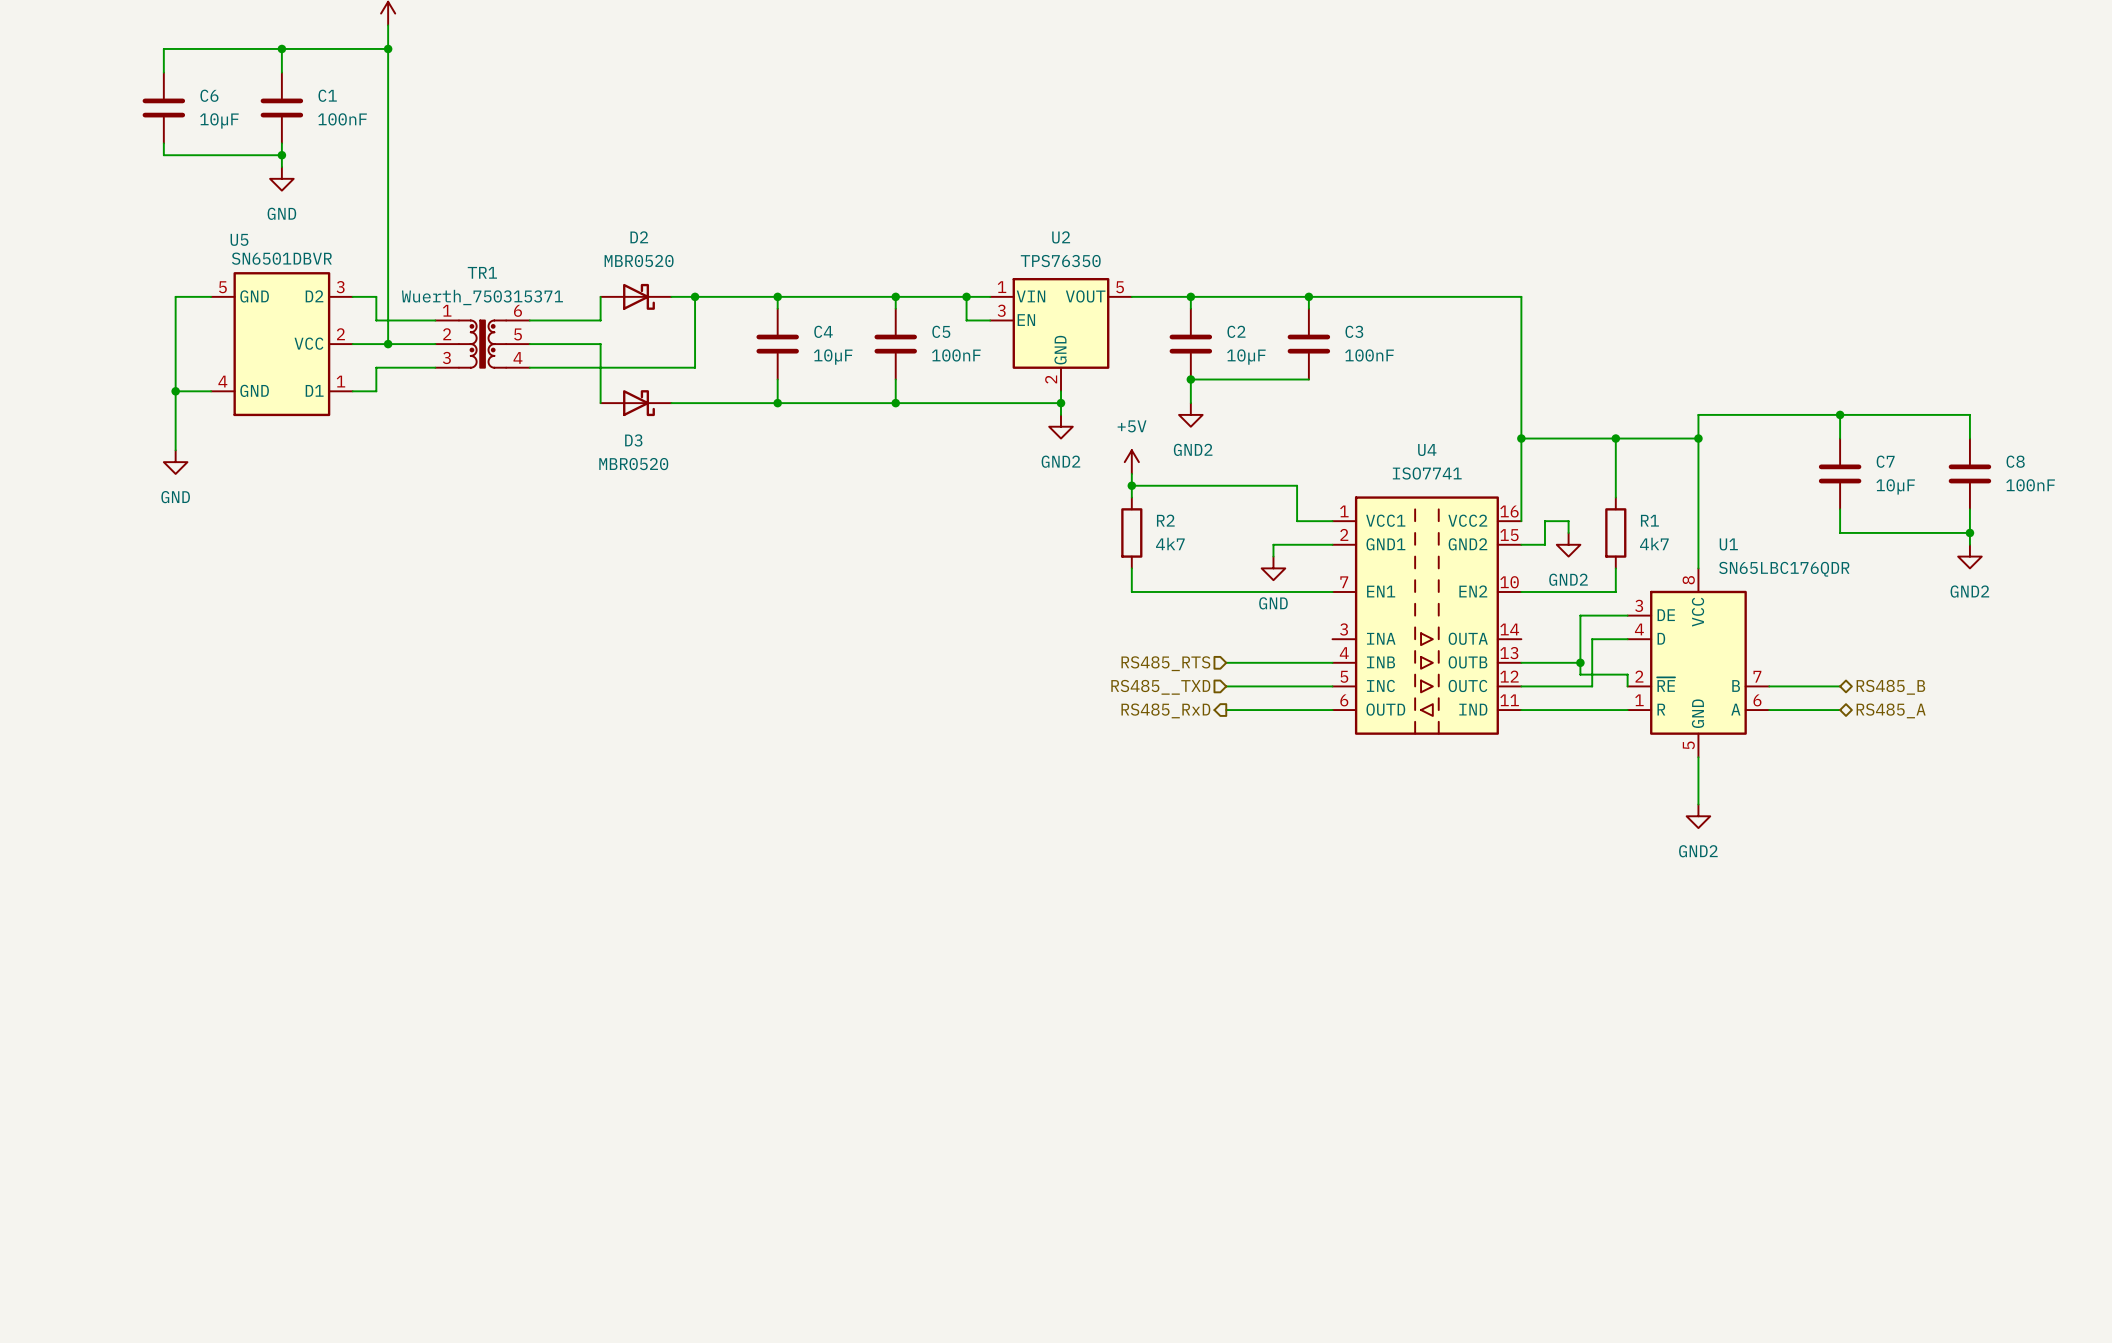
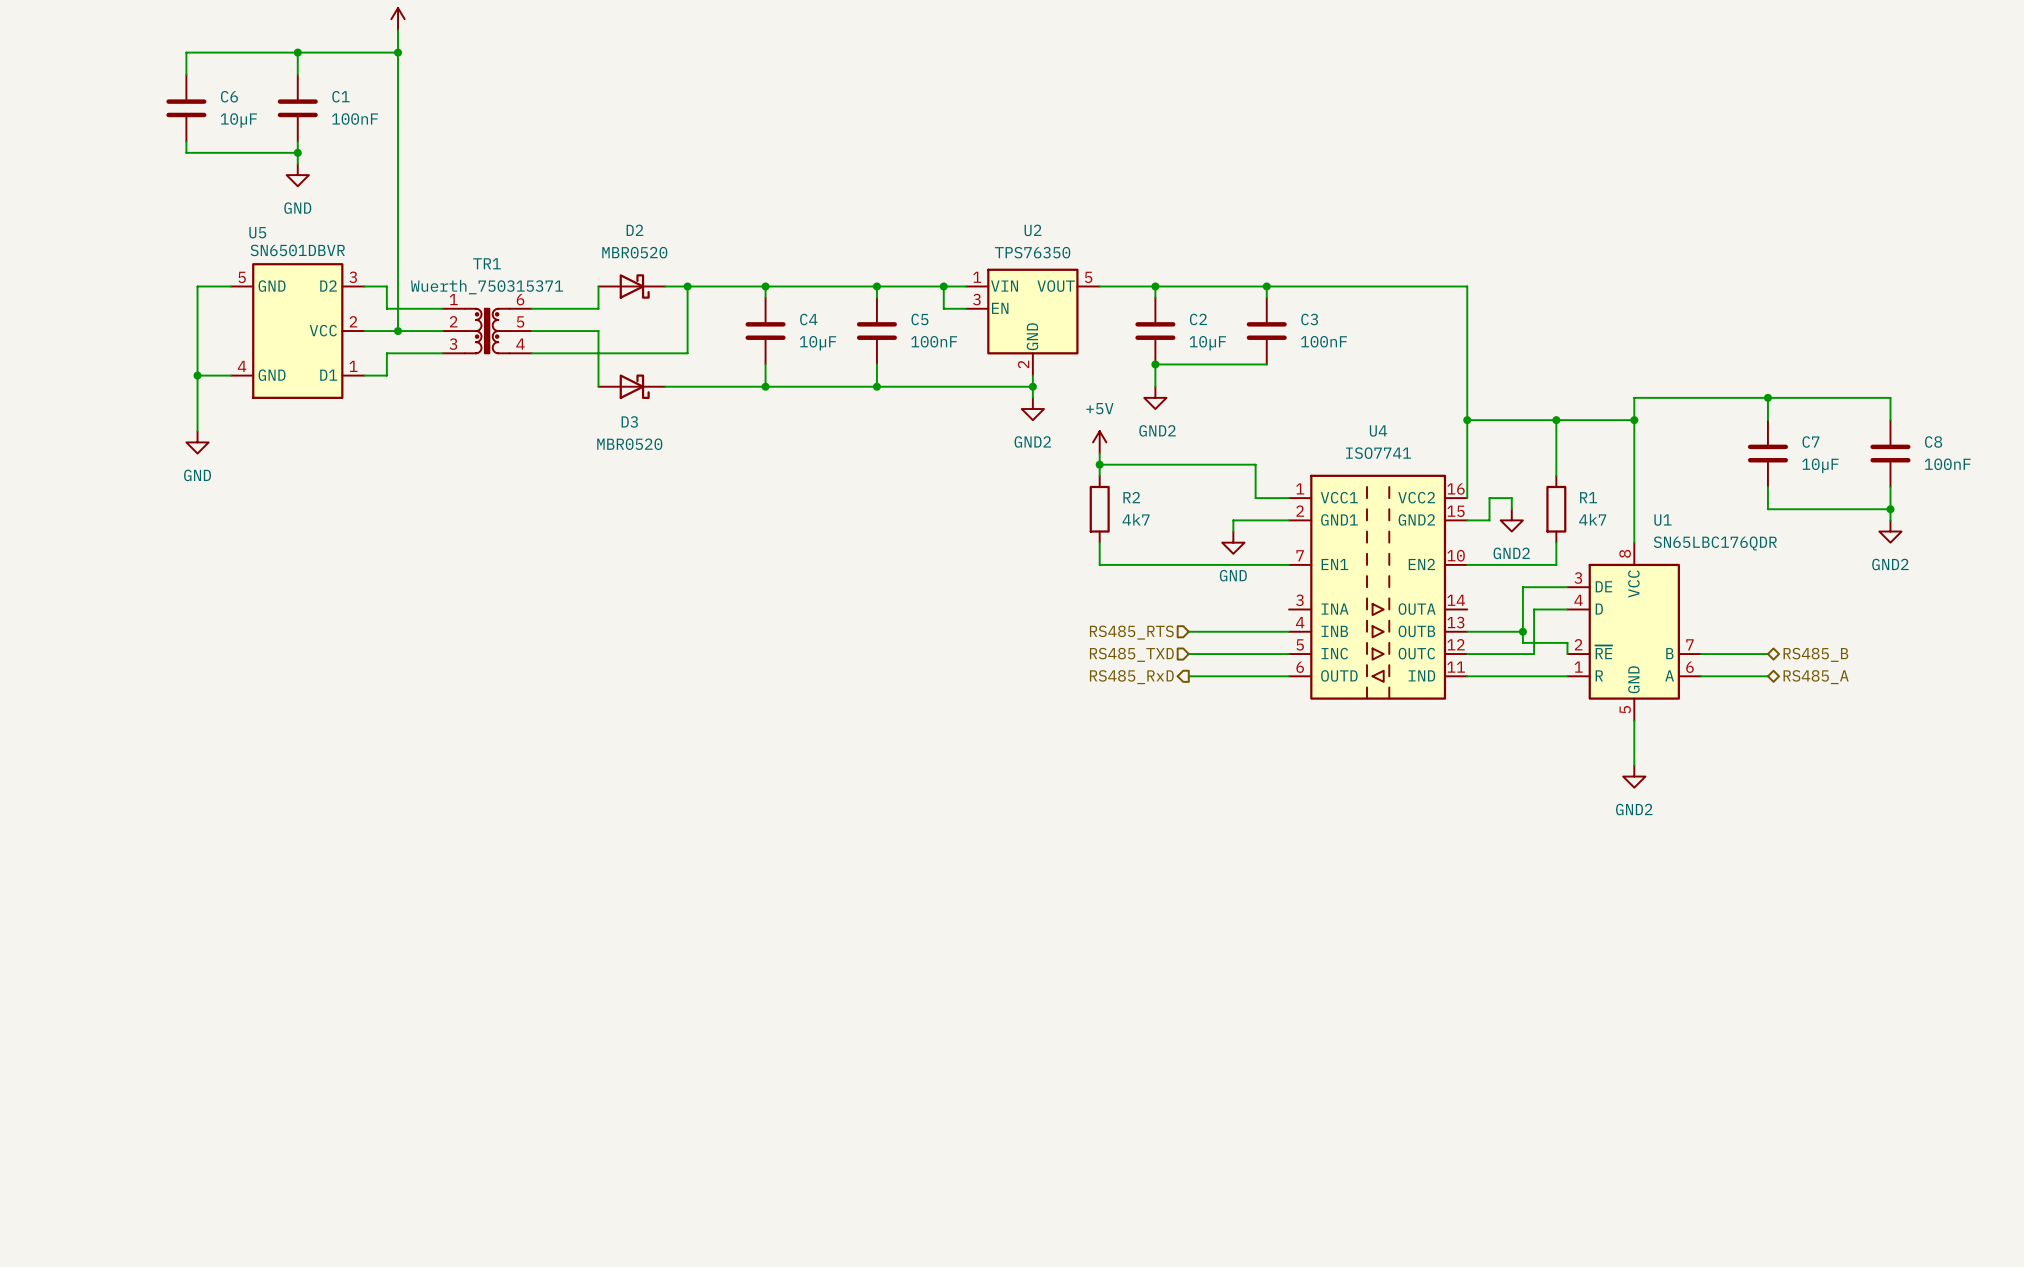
hierarchical label: RS485__TXD (1160, 687) -> RS485_TXD (1131, 654)

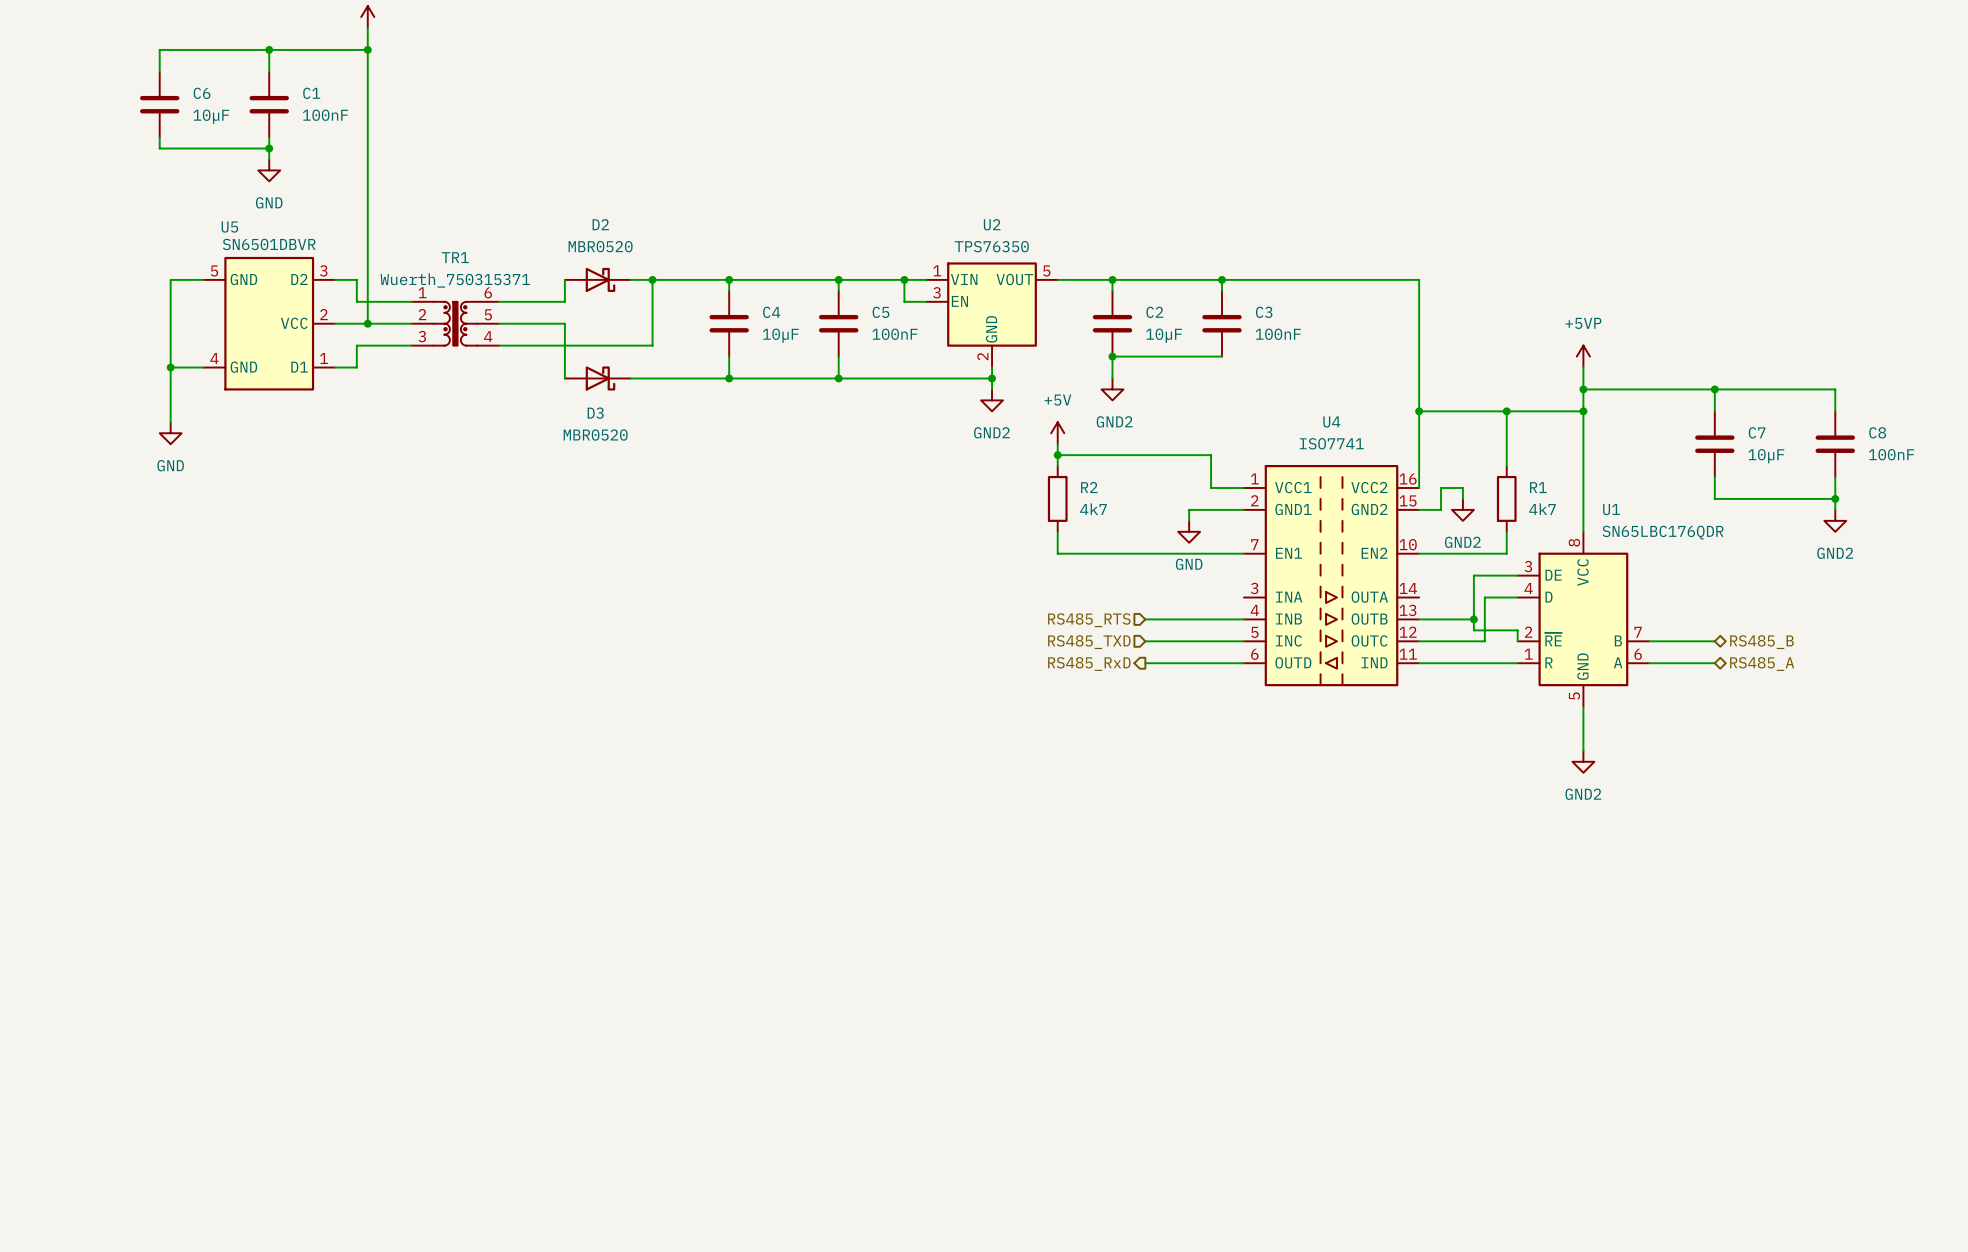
power symbol: none -> +5VP (1583, 356)
wire: none -> (1583, 367) (1583, 389)
junction: none -> (1583, 389)

